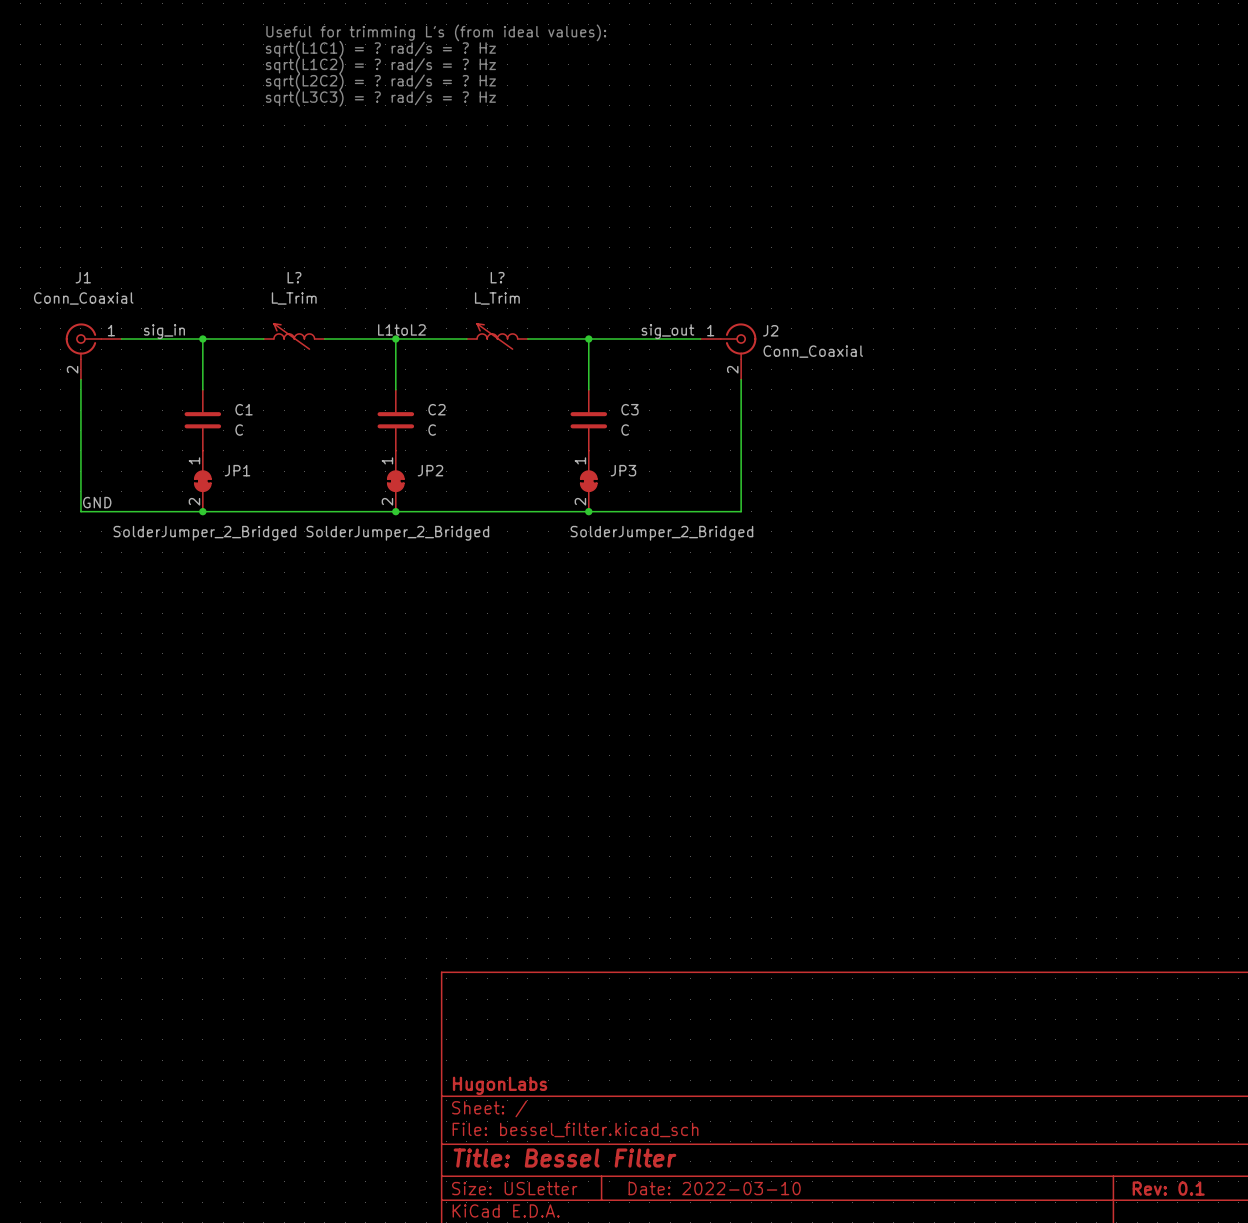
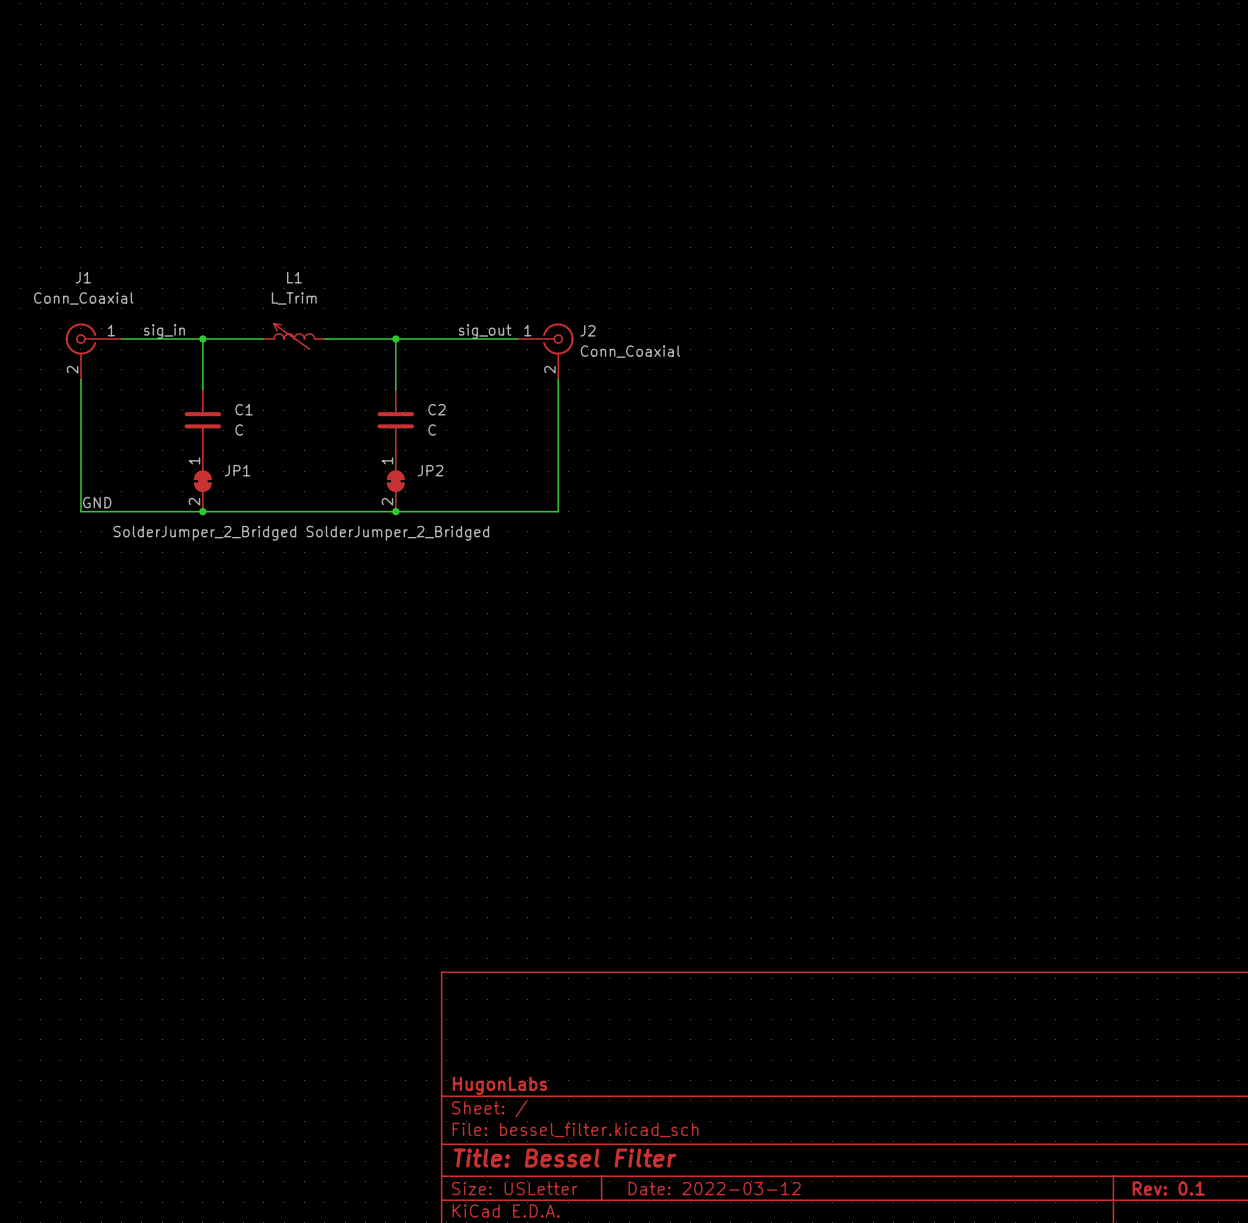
text: Useful for trimming L's (from ideal values): (436, 32) -> none
text: sqrt(L1C1) = ? rad/s = ? Hz (380, 49) -> none
text: sqrt(L1C2) = ? rad/s = ? Hz (380, 65) -> none
text: sqrt(L2C2) = ? rad/s = ? Hz (380, 81) -> none
text: sqrt(L3C3) = ? rad/s = ? Hz (380, 98) -> none
L? name: L? (294, 277) -> L1 (294, 277)
label: L1toL2 (401, 329) -> none
label position: sig_out (667, 331) -> sig_out (485, 331)
L?: L_Trim (497, 336) -> none
wire: none -> (466, 339) (517, 339)
wire: (527, 339) (700, 339) -> none
wire: (588, 339) (588, 389) -> none
junction: (588, 339) -> none
J2 position: (728, 351) -> (545, 351)
wire: (741, 379) (741, 511) (558, 511) -> (558, 379) (558, 511)
C3: C (588, 420) -> none
JP3: SolderJumper_2_Bridged (588, 481) -> none
junction: (588, 511) -> none
title block: Date: 2022-03-10 (714, 1188) -> Date: 2022-03-12 (714, 1188)

